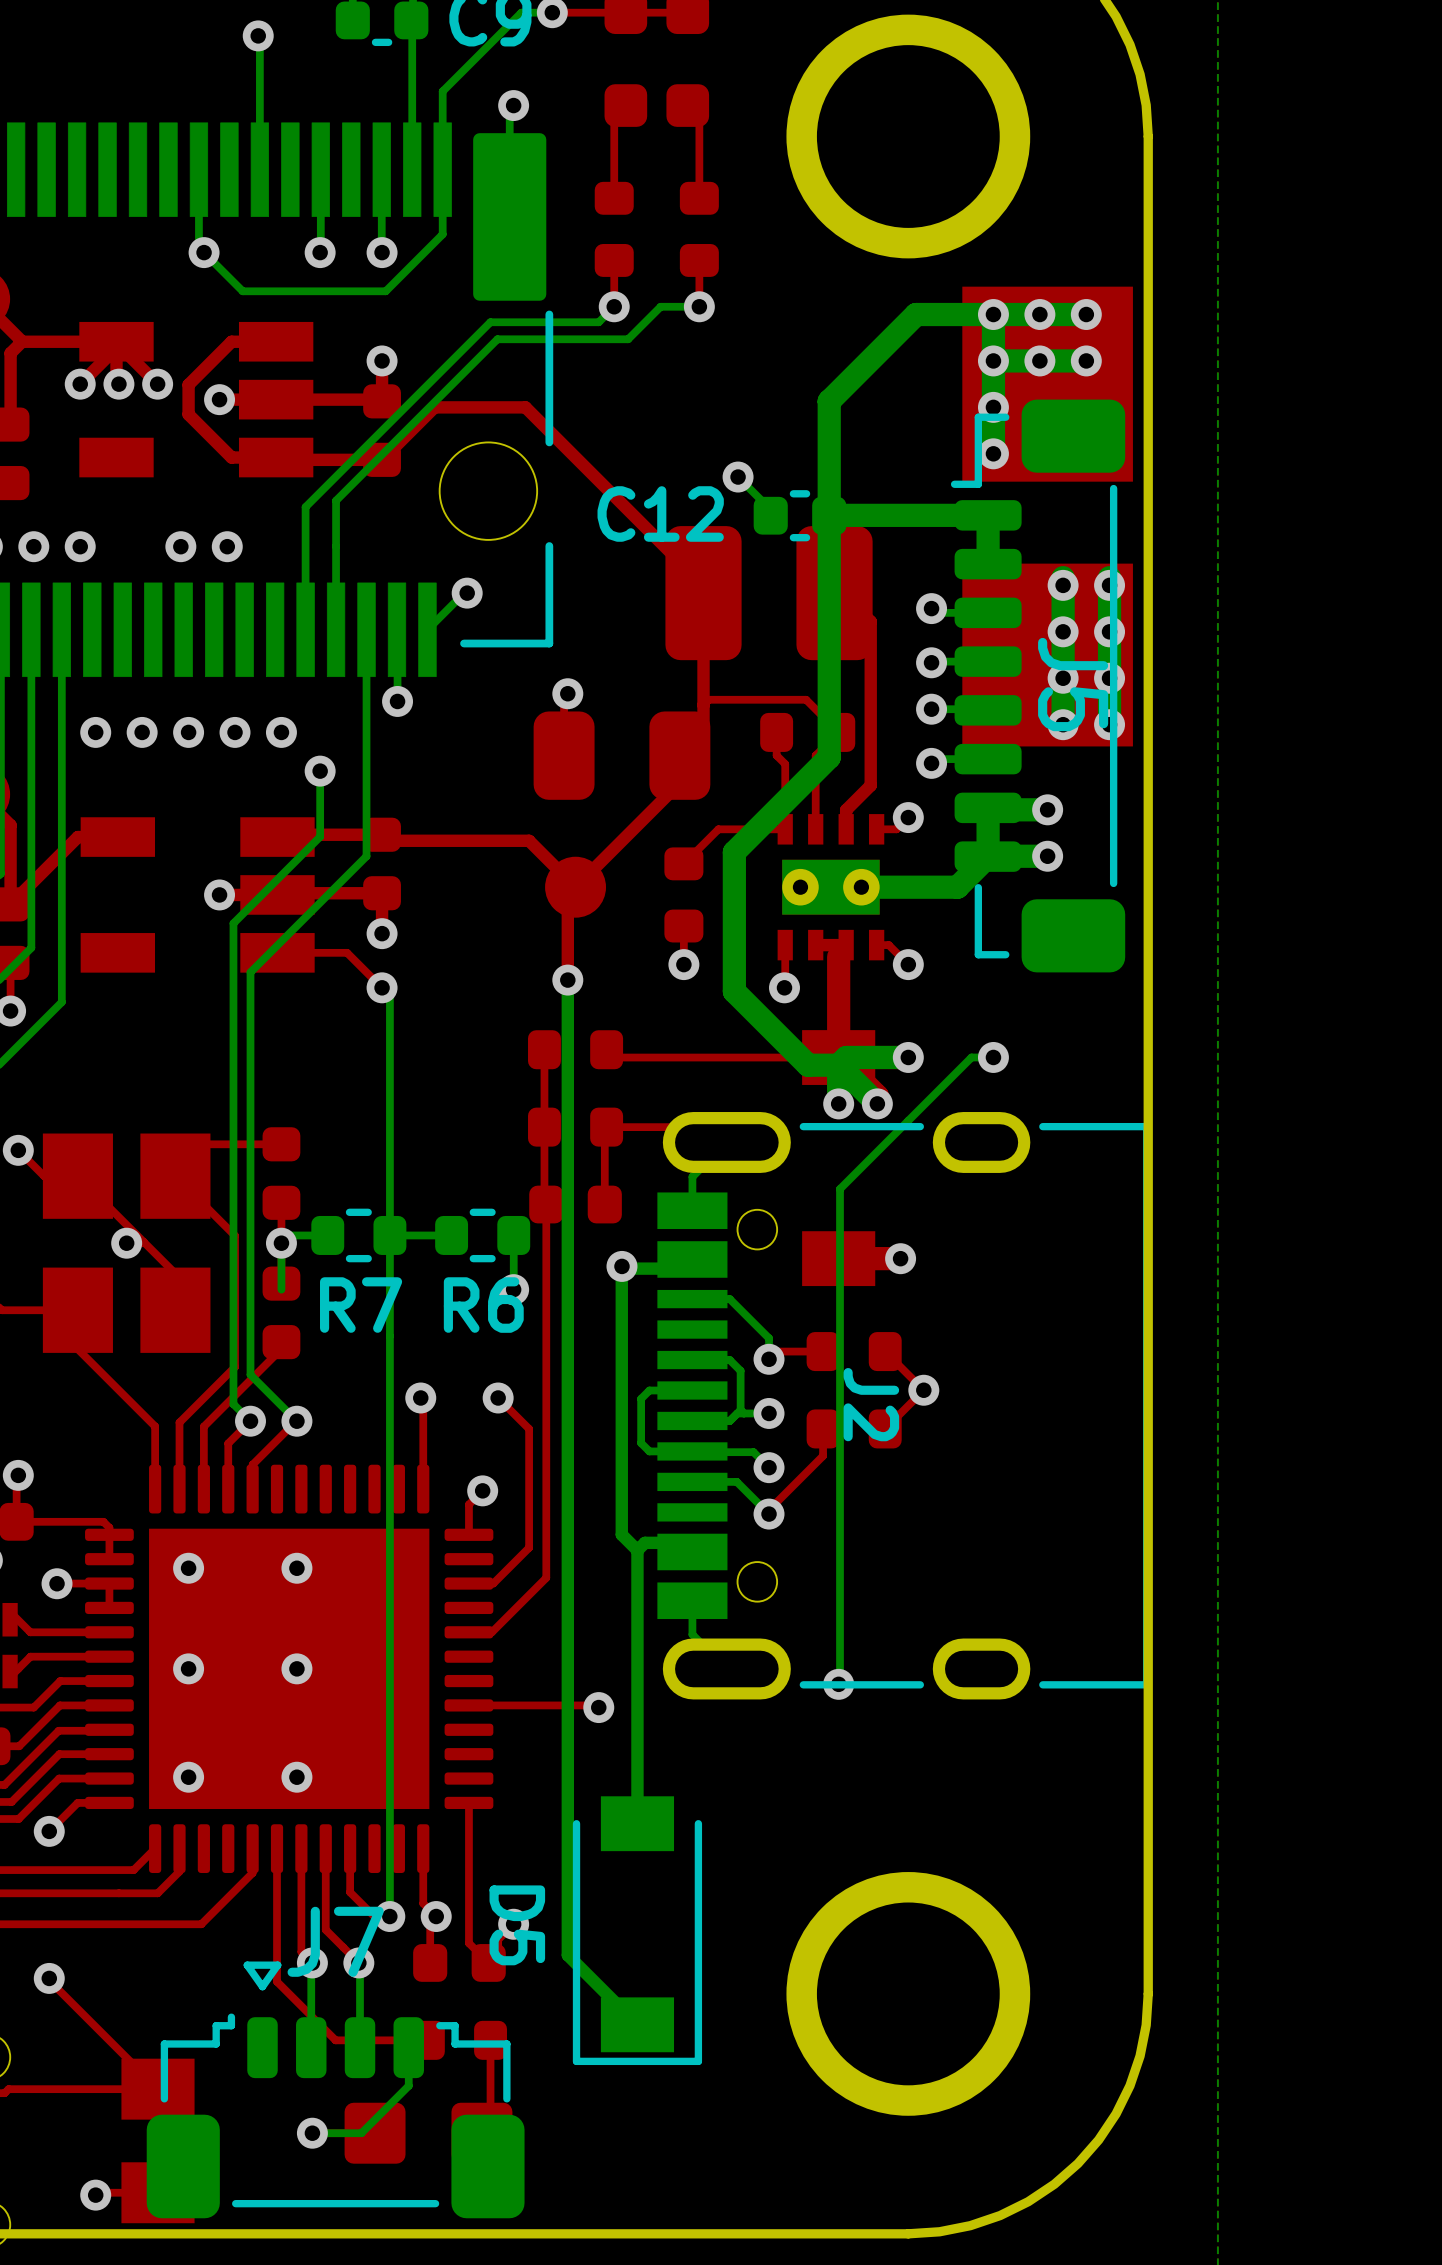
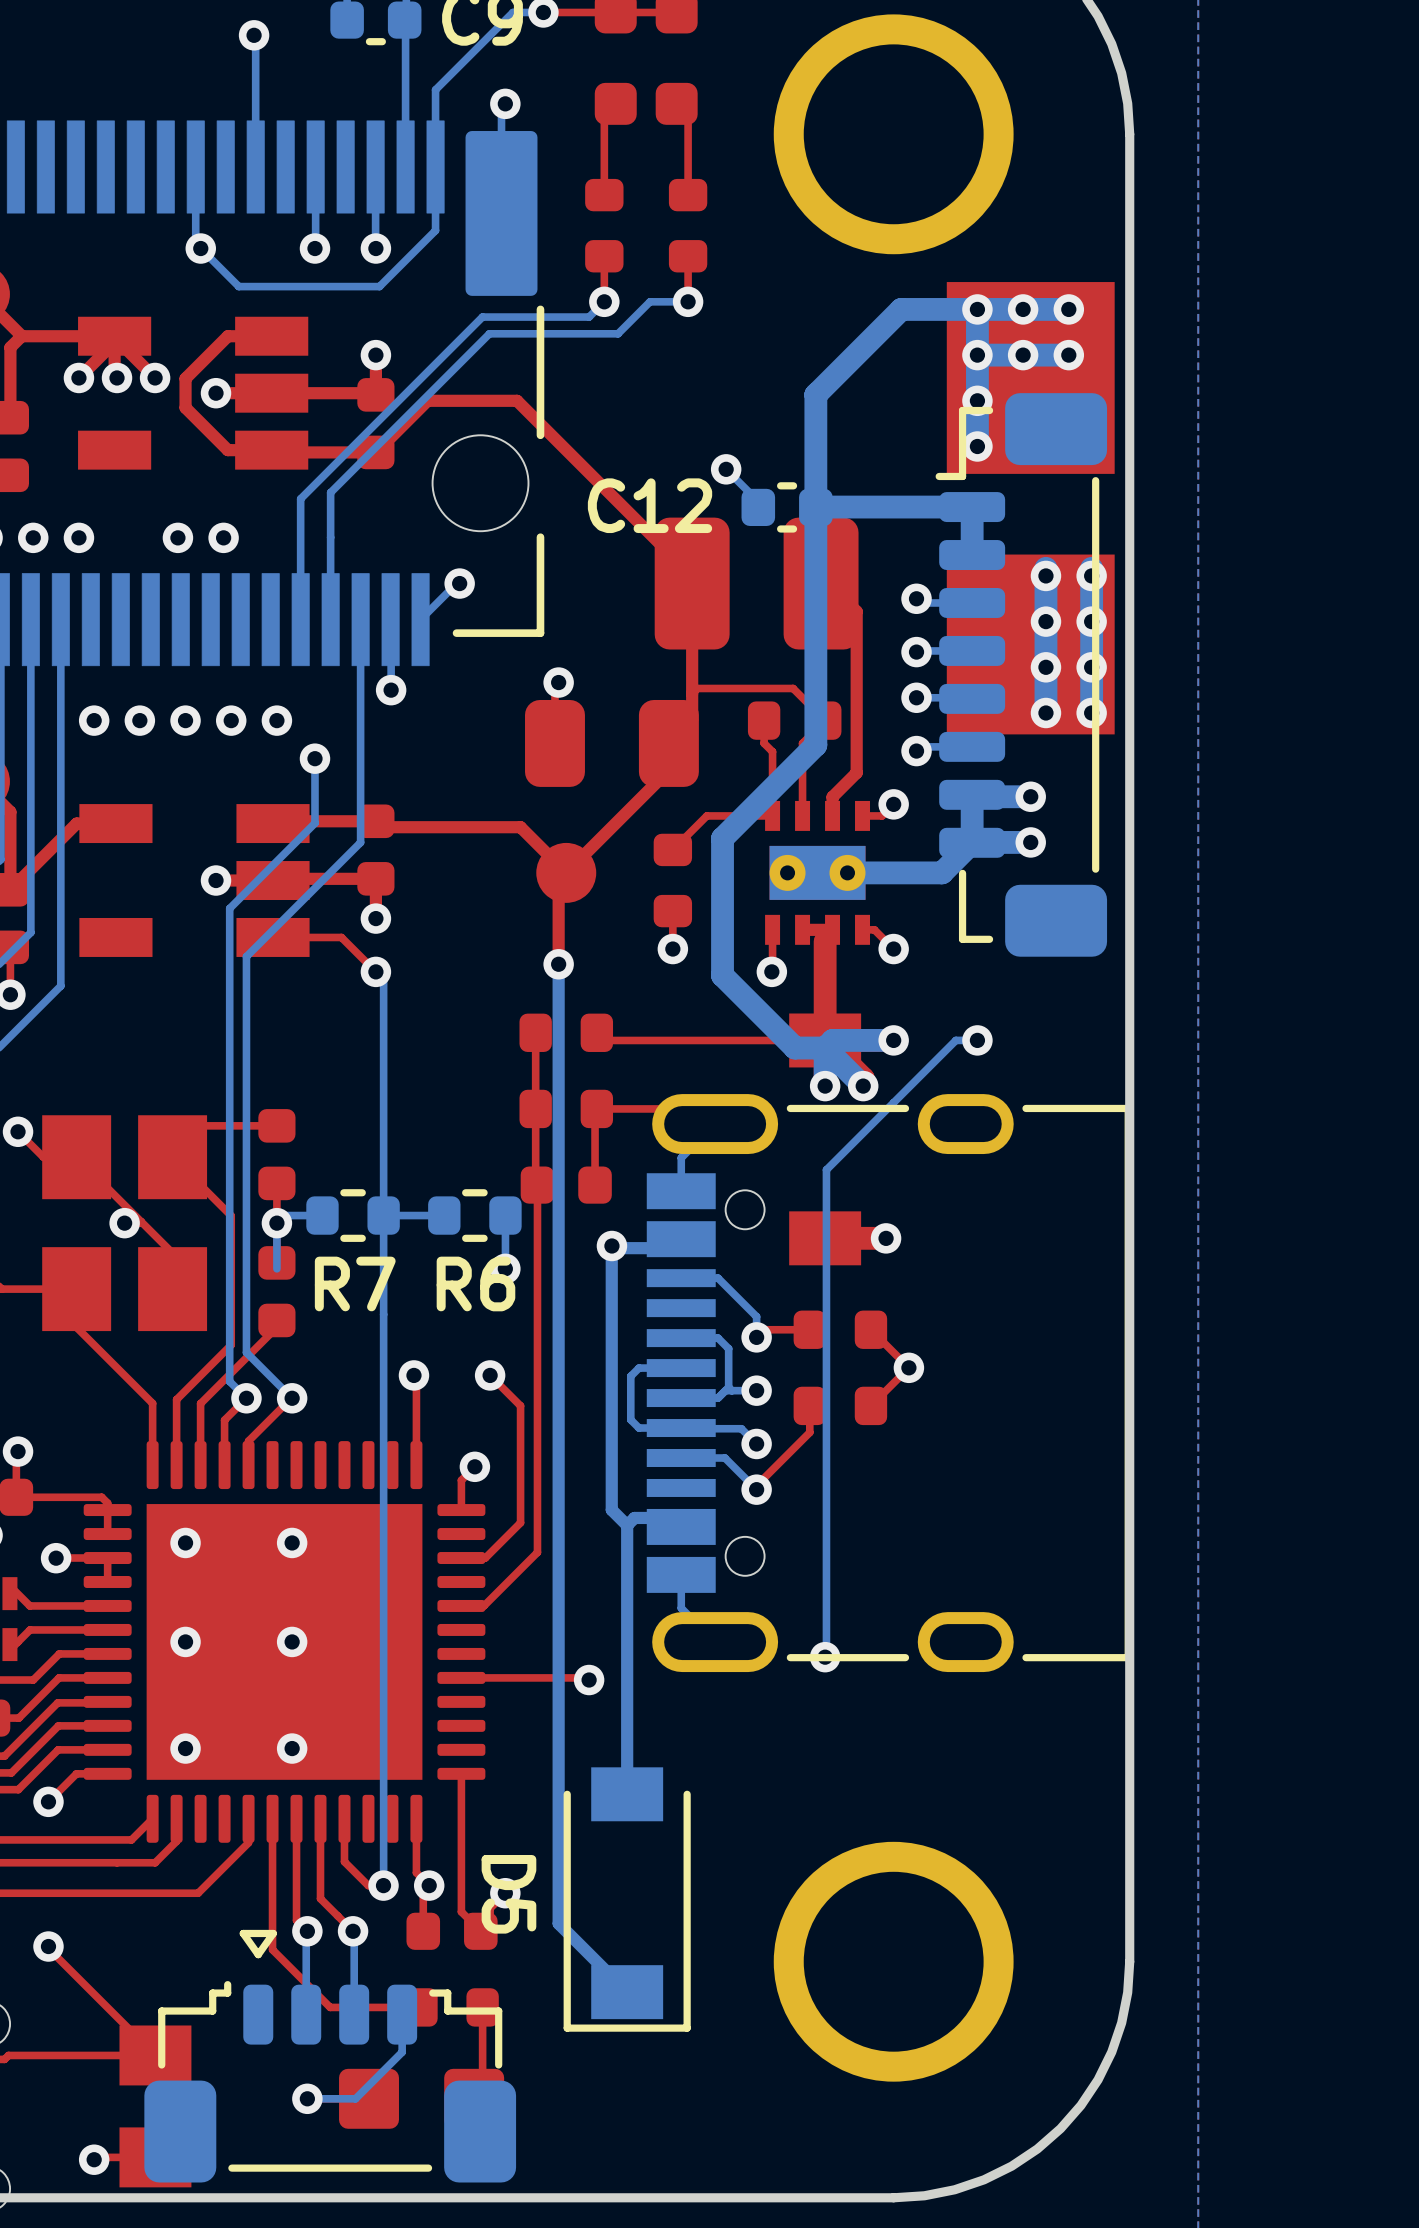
J5 name: J5 (1073, 684) -> none
J2 name: J2 (871, 1404) -> none
J7 name: J7 (335, 1941) -> none

